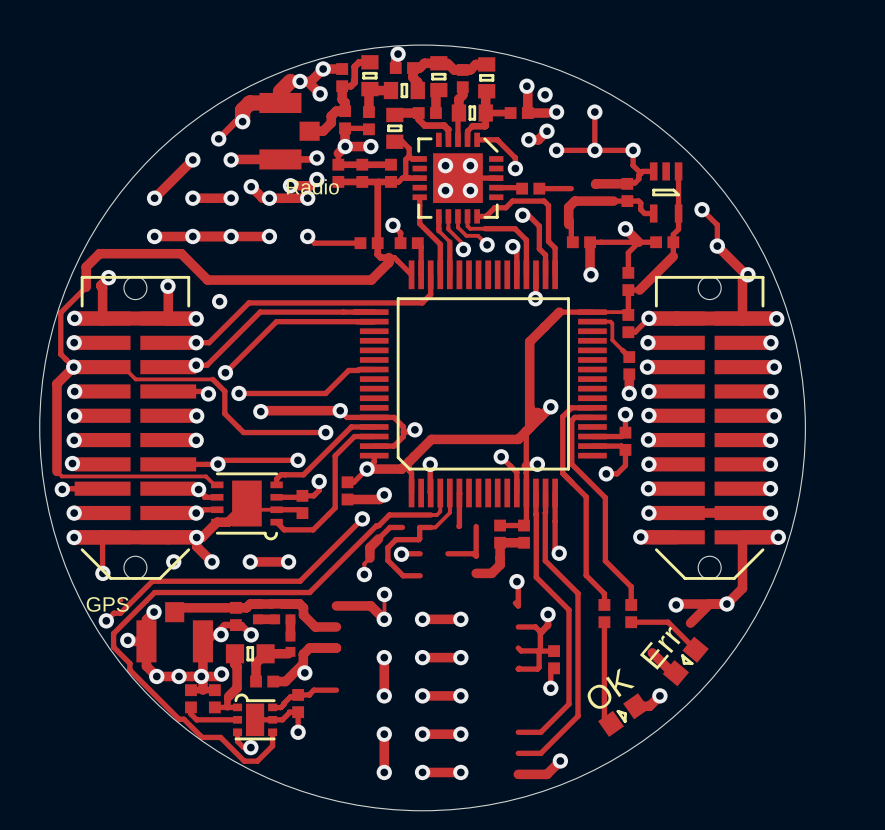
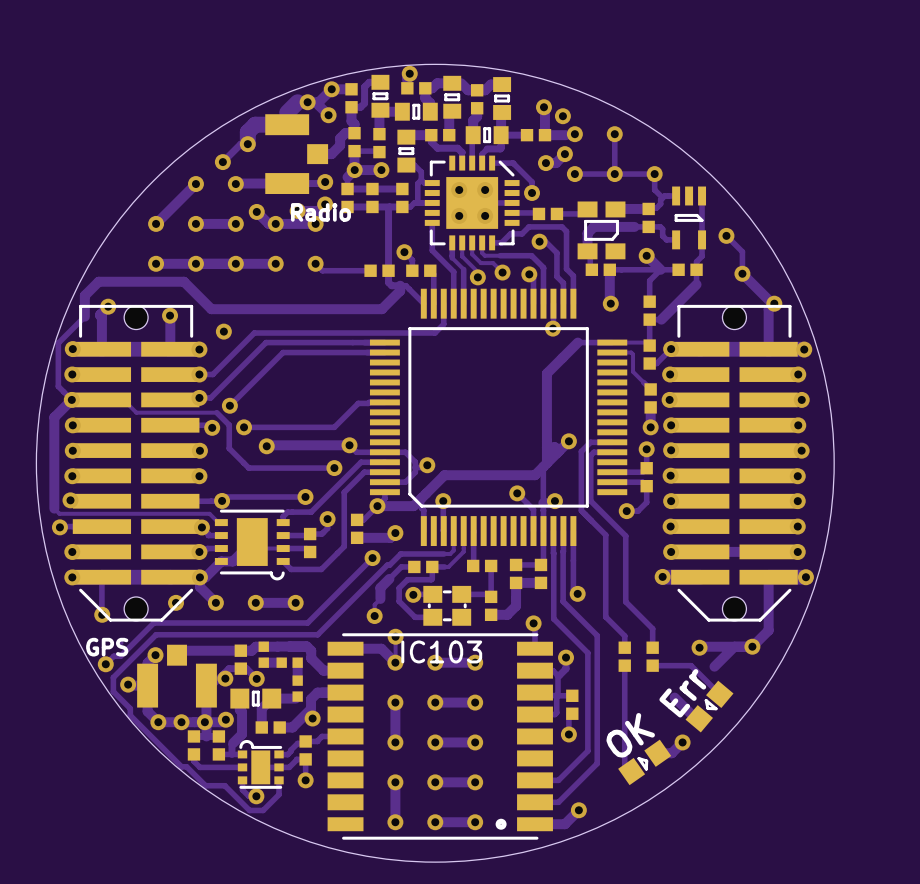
part: none -> (601, 230)
part: none -> (482, 565)
part: none -> (423, 566)
part: none -> (447, 605)
part: none -> (491, 605)
IC103: none -> (440, 736)

